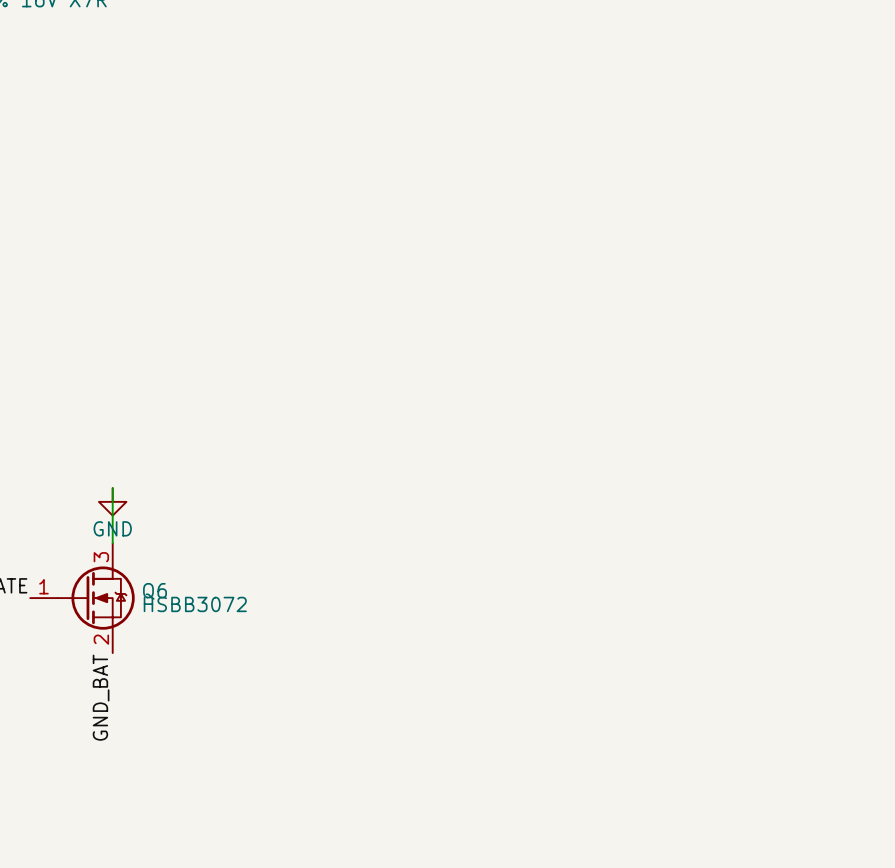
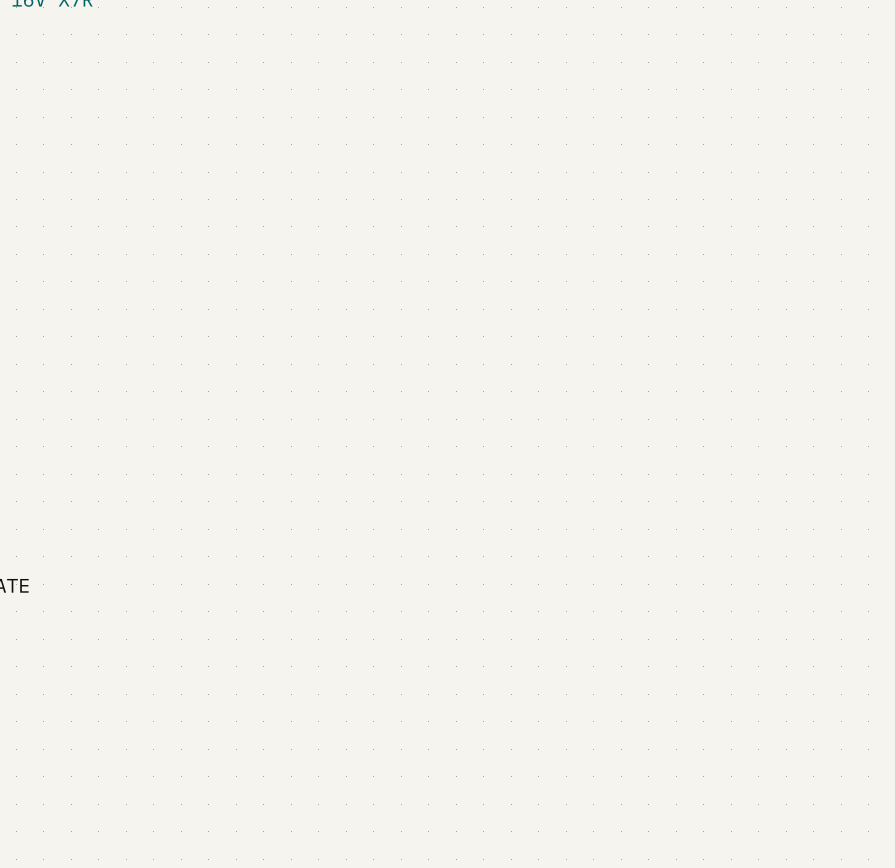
wire: (112, 488) (112, 543) -> none
power symbol: GND (112, 501) -> none
Q6: HSBB3072 (82, 598) -> none
label: GND_BAT (101, 697) -> none

